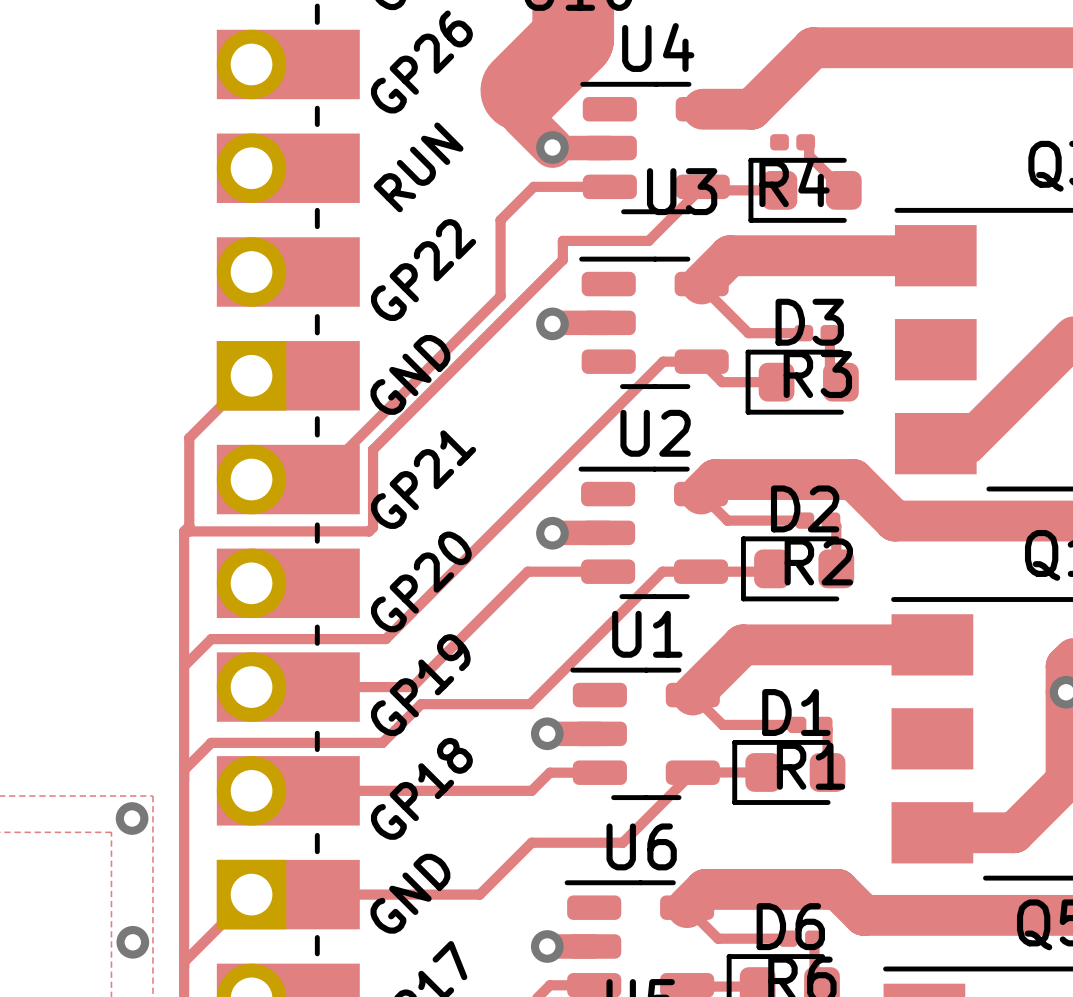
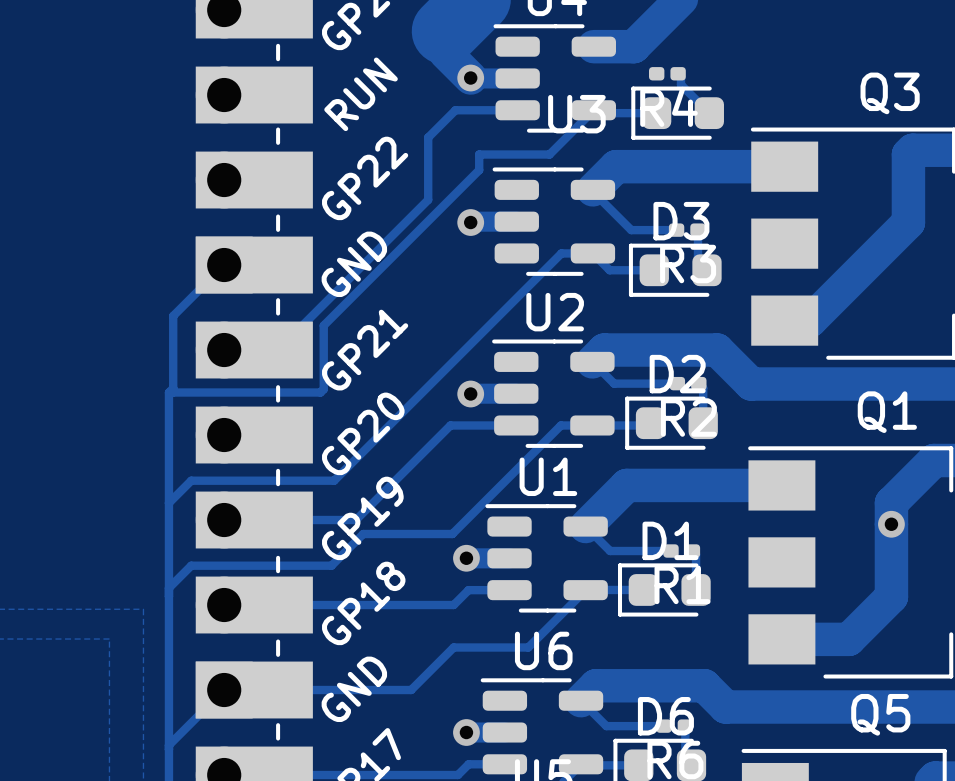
via: (132, 818) -> none
via: (132, 942) -> none

